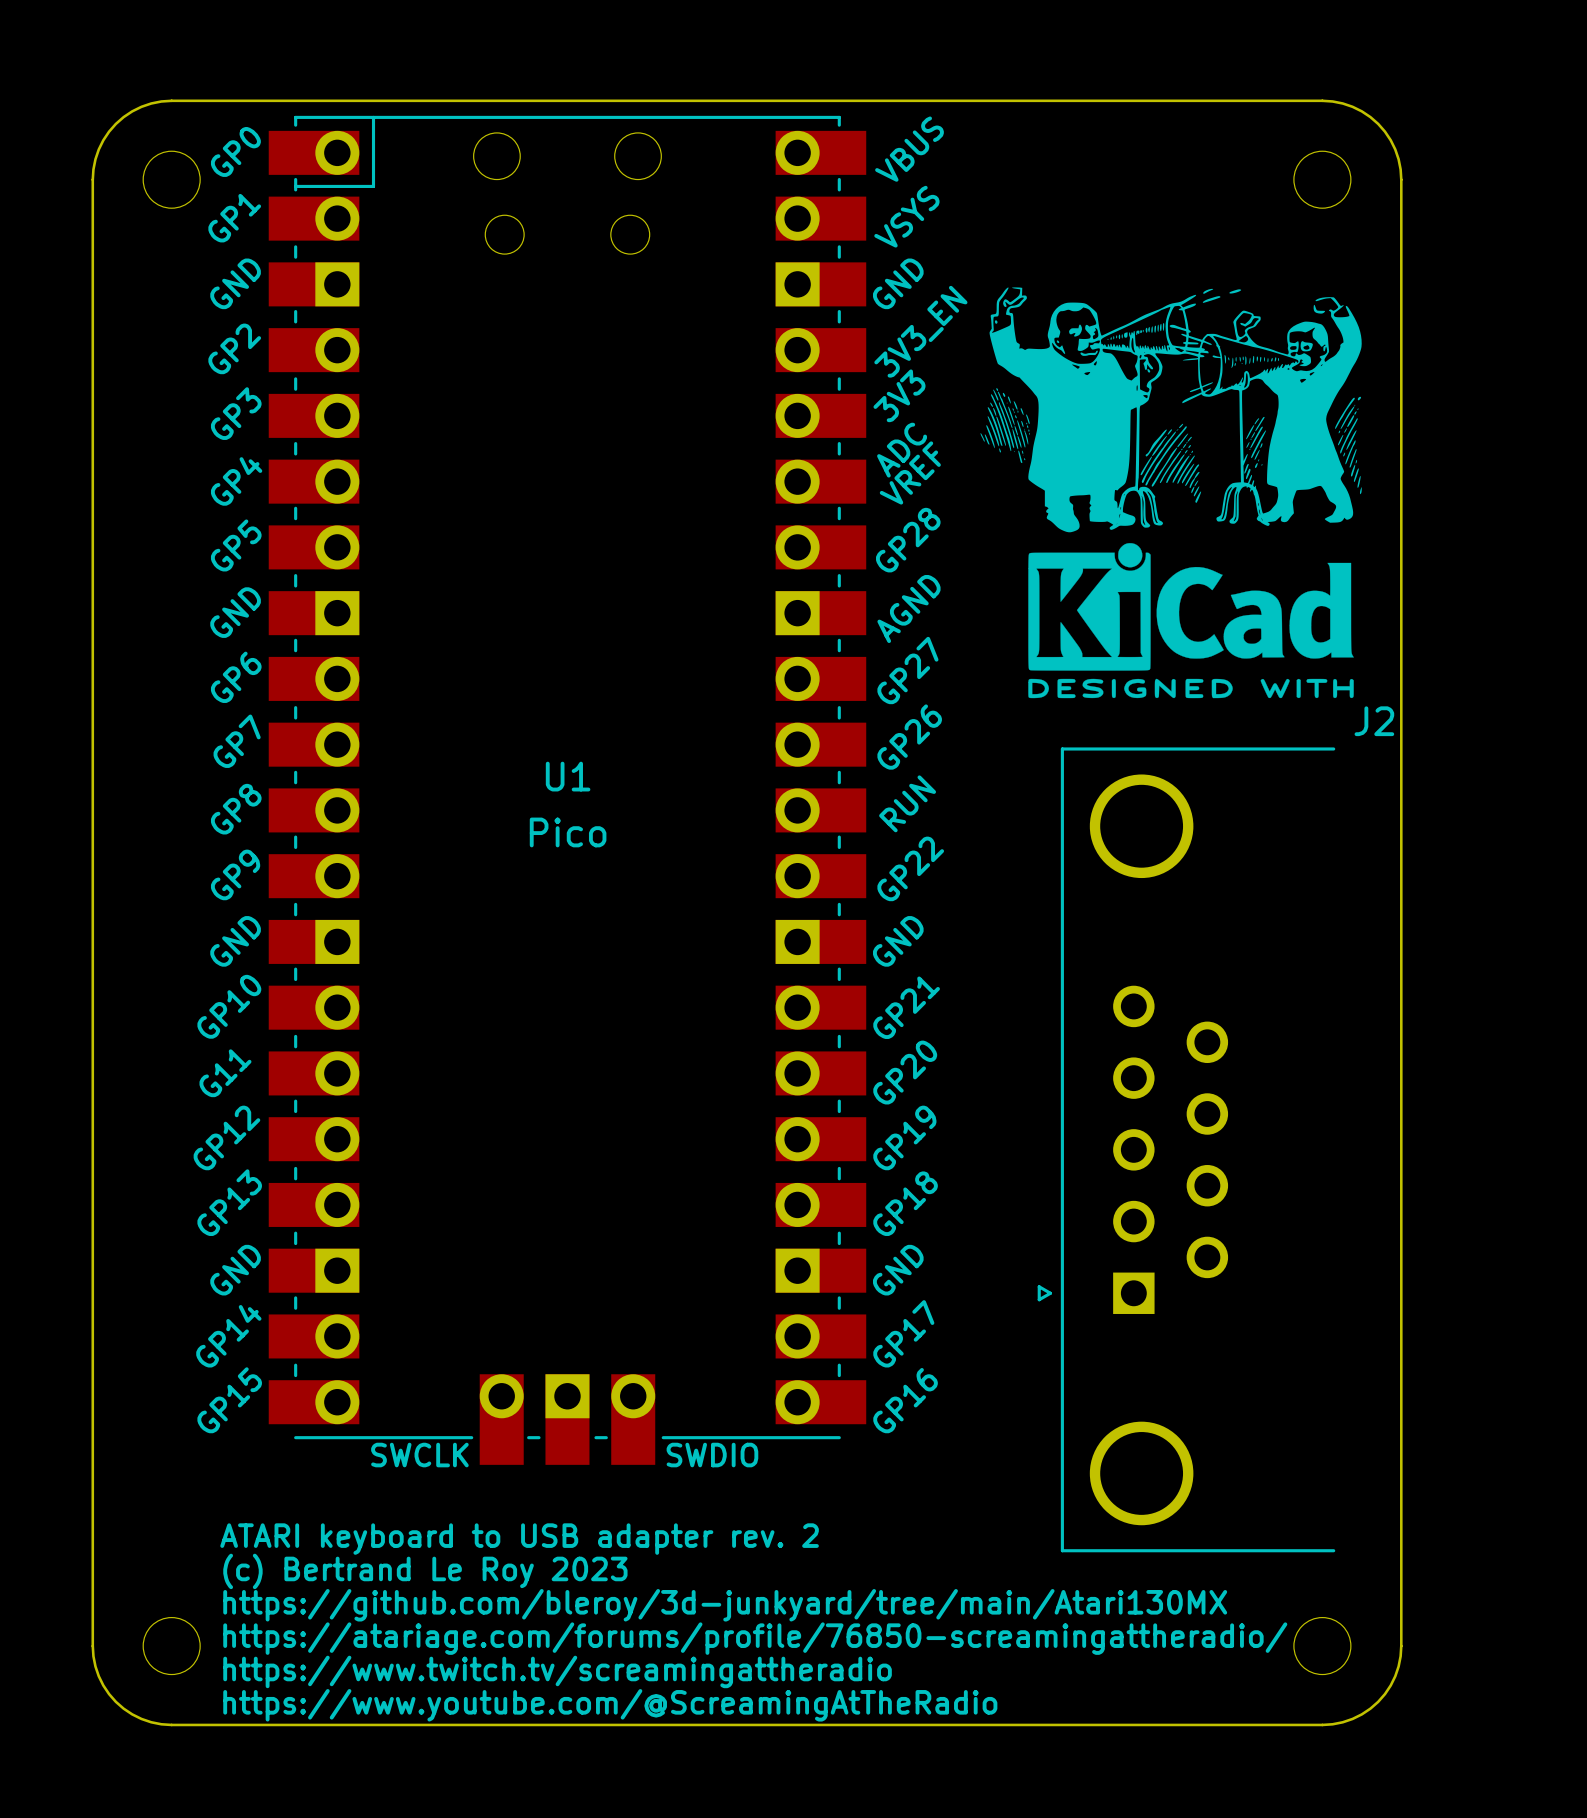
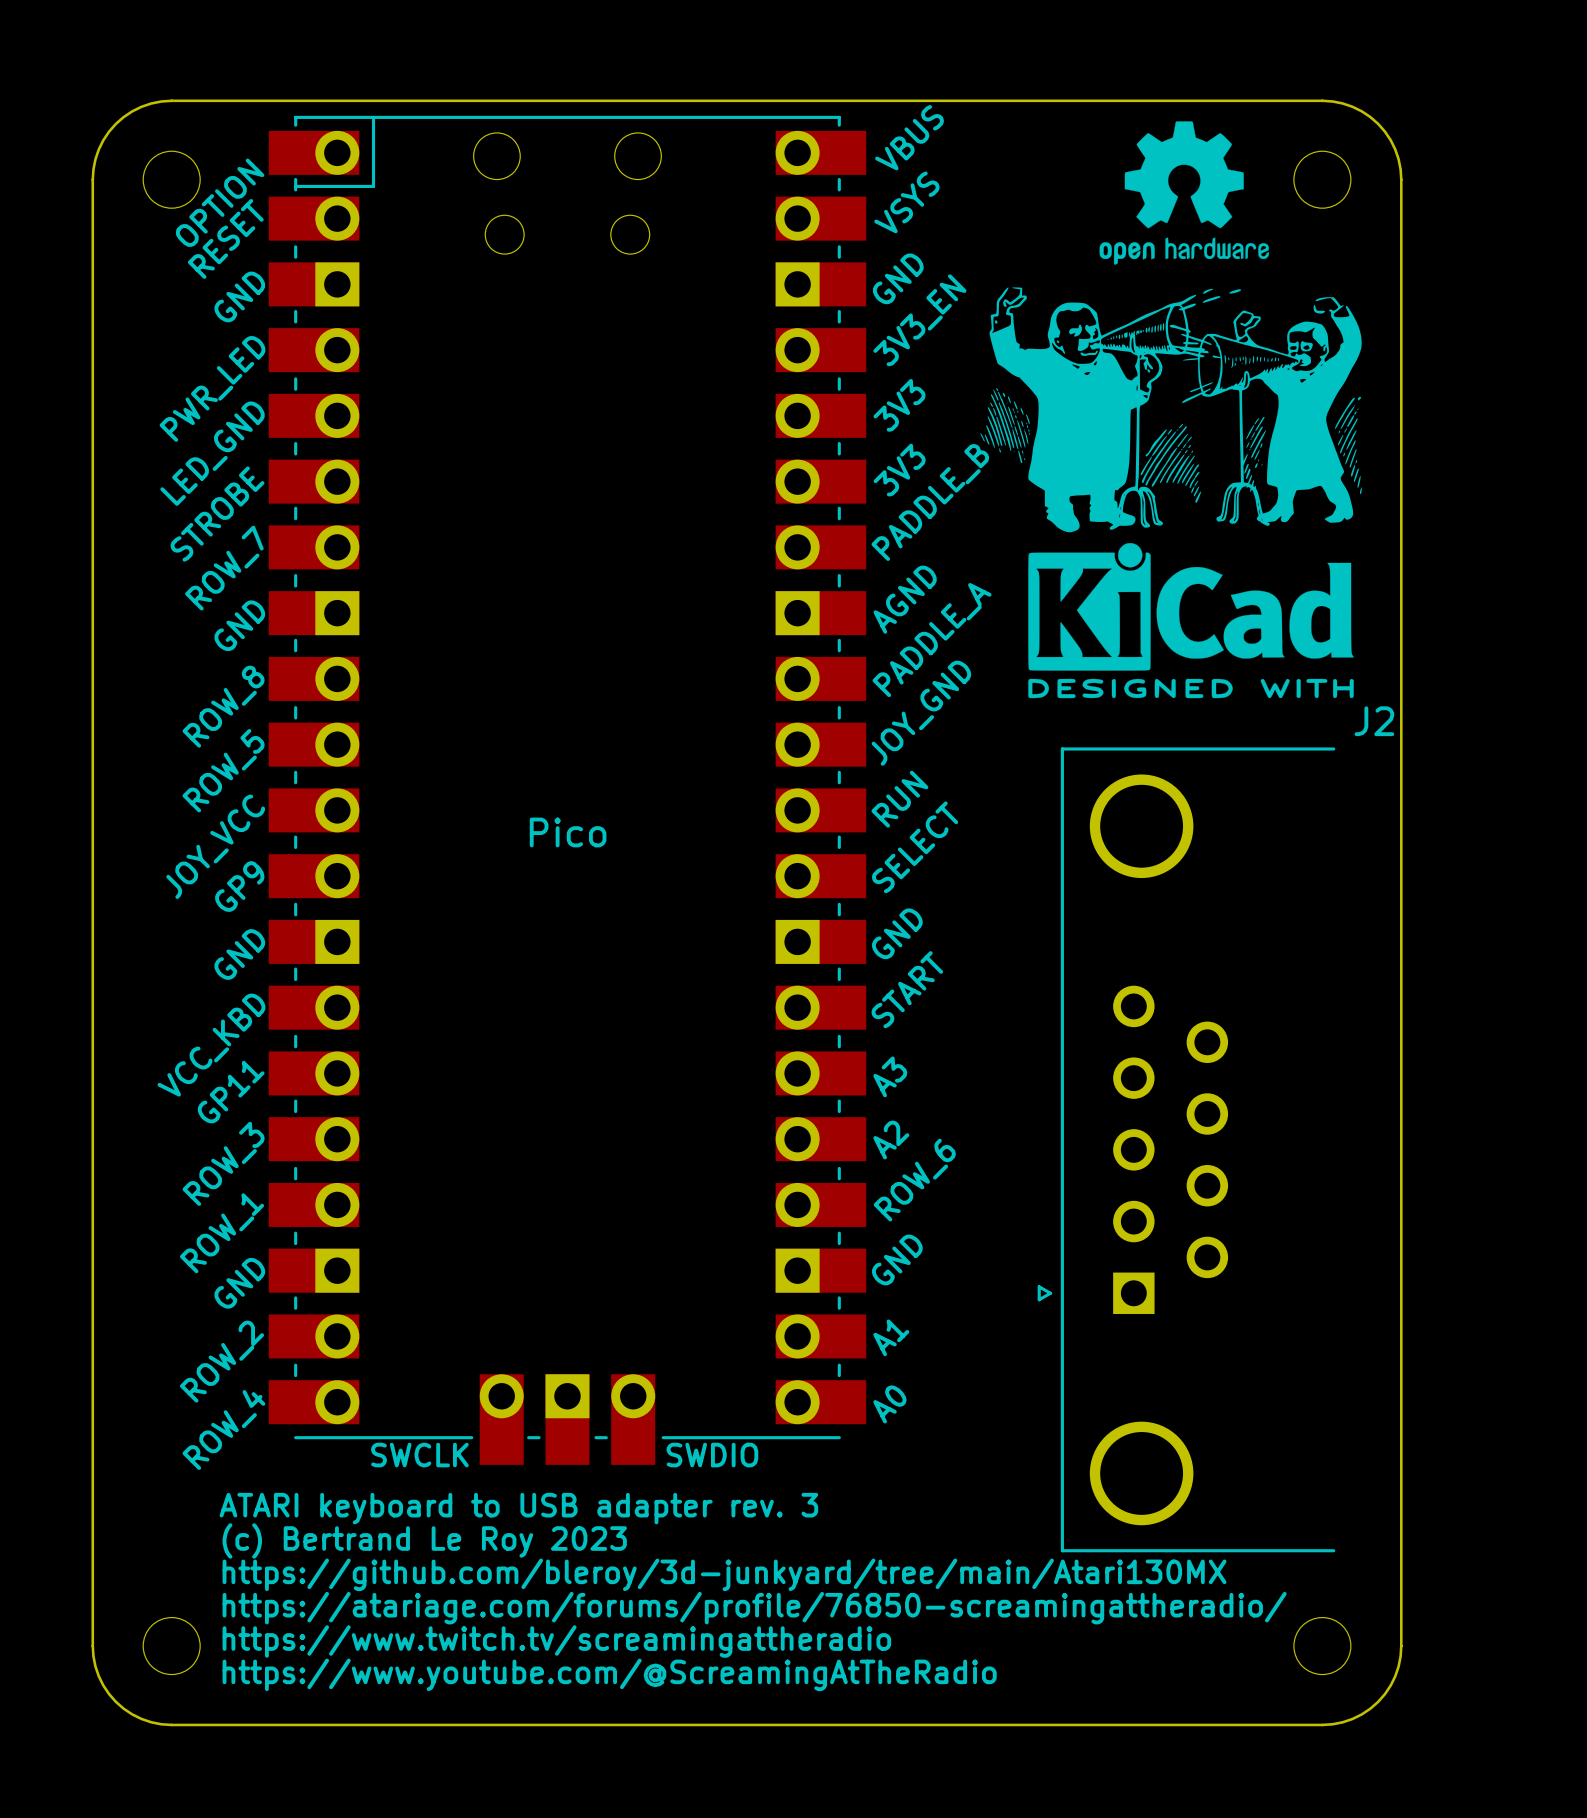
U1 footprint: [268, 115, 867, 1465] -> [268, 115, 867, 1465]
drawing: none -> [1099, 121, 1269, 265]
U1 name: U1 (568, 776) -> none
text: ATARI keyboard to USB adapter rev. 2 (519, 1539) -> ATARI keyboard to USB adapter rev. 3 (518, 1508)
text position: (c) Bertrand Le Roy 2023 (425, 1571) -> (c) Bertrand Le Roy 2023 (424, 1540)
text position: https://github.com/bleroy/3d-junkyard/tree/main/Atari130MX (725, 1605) -> https://github.com/bleroy/3d-junkyard/tree/main/Atari130MX (724, 1574)
text position: https://atariage.com/forums/profile/76850-screamingattheradio/ (755, 1638) -> https://atariage.com/forums/profile/76850-screamingattheradio/ (754, 1608)
text position: https://www.twitch.tv/screamingattheradio (557, 1671) -> https://www.twitch.tv/screamingattheradio (556, 1641)
text position: https://www.youtube.com/@ScreamingAtTheRadio (610, 1705) -> https://www.youtube.com/@ScreamingAtTheRadio (609, 1674)

